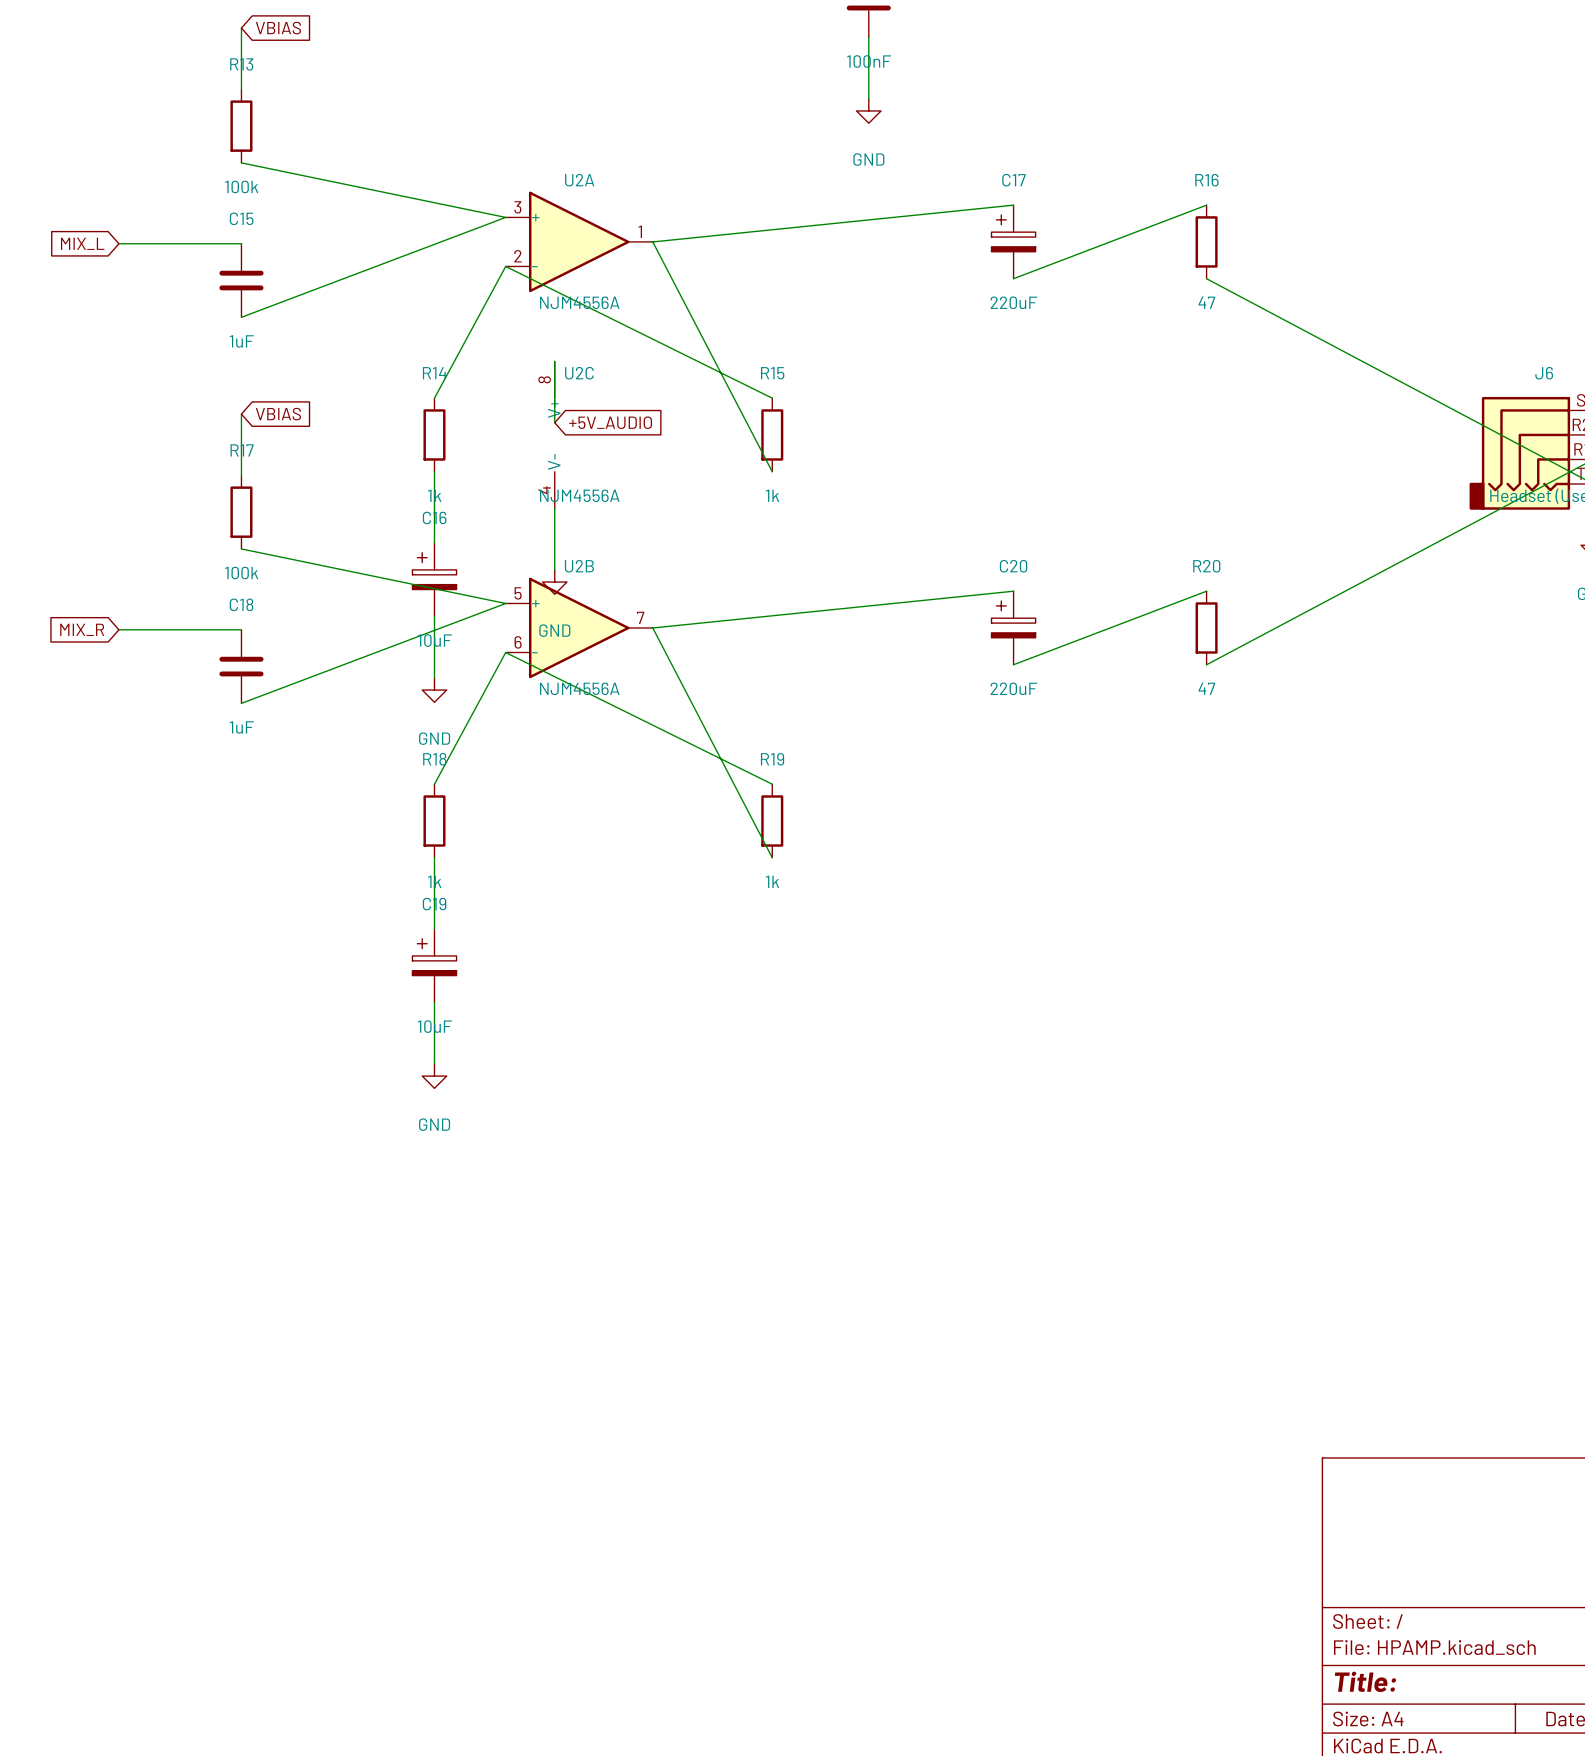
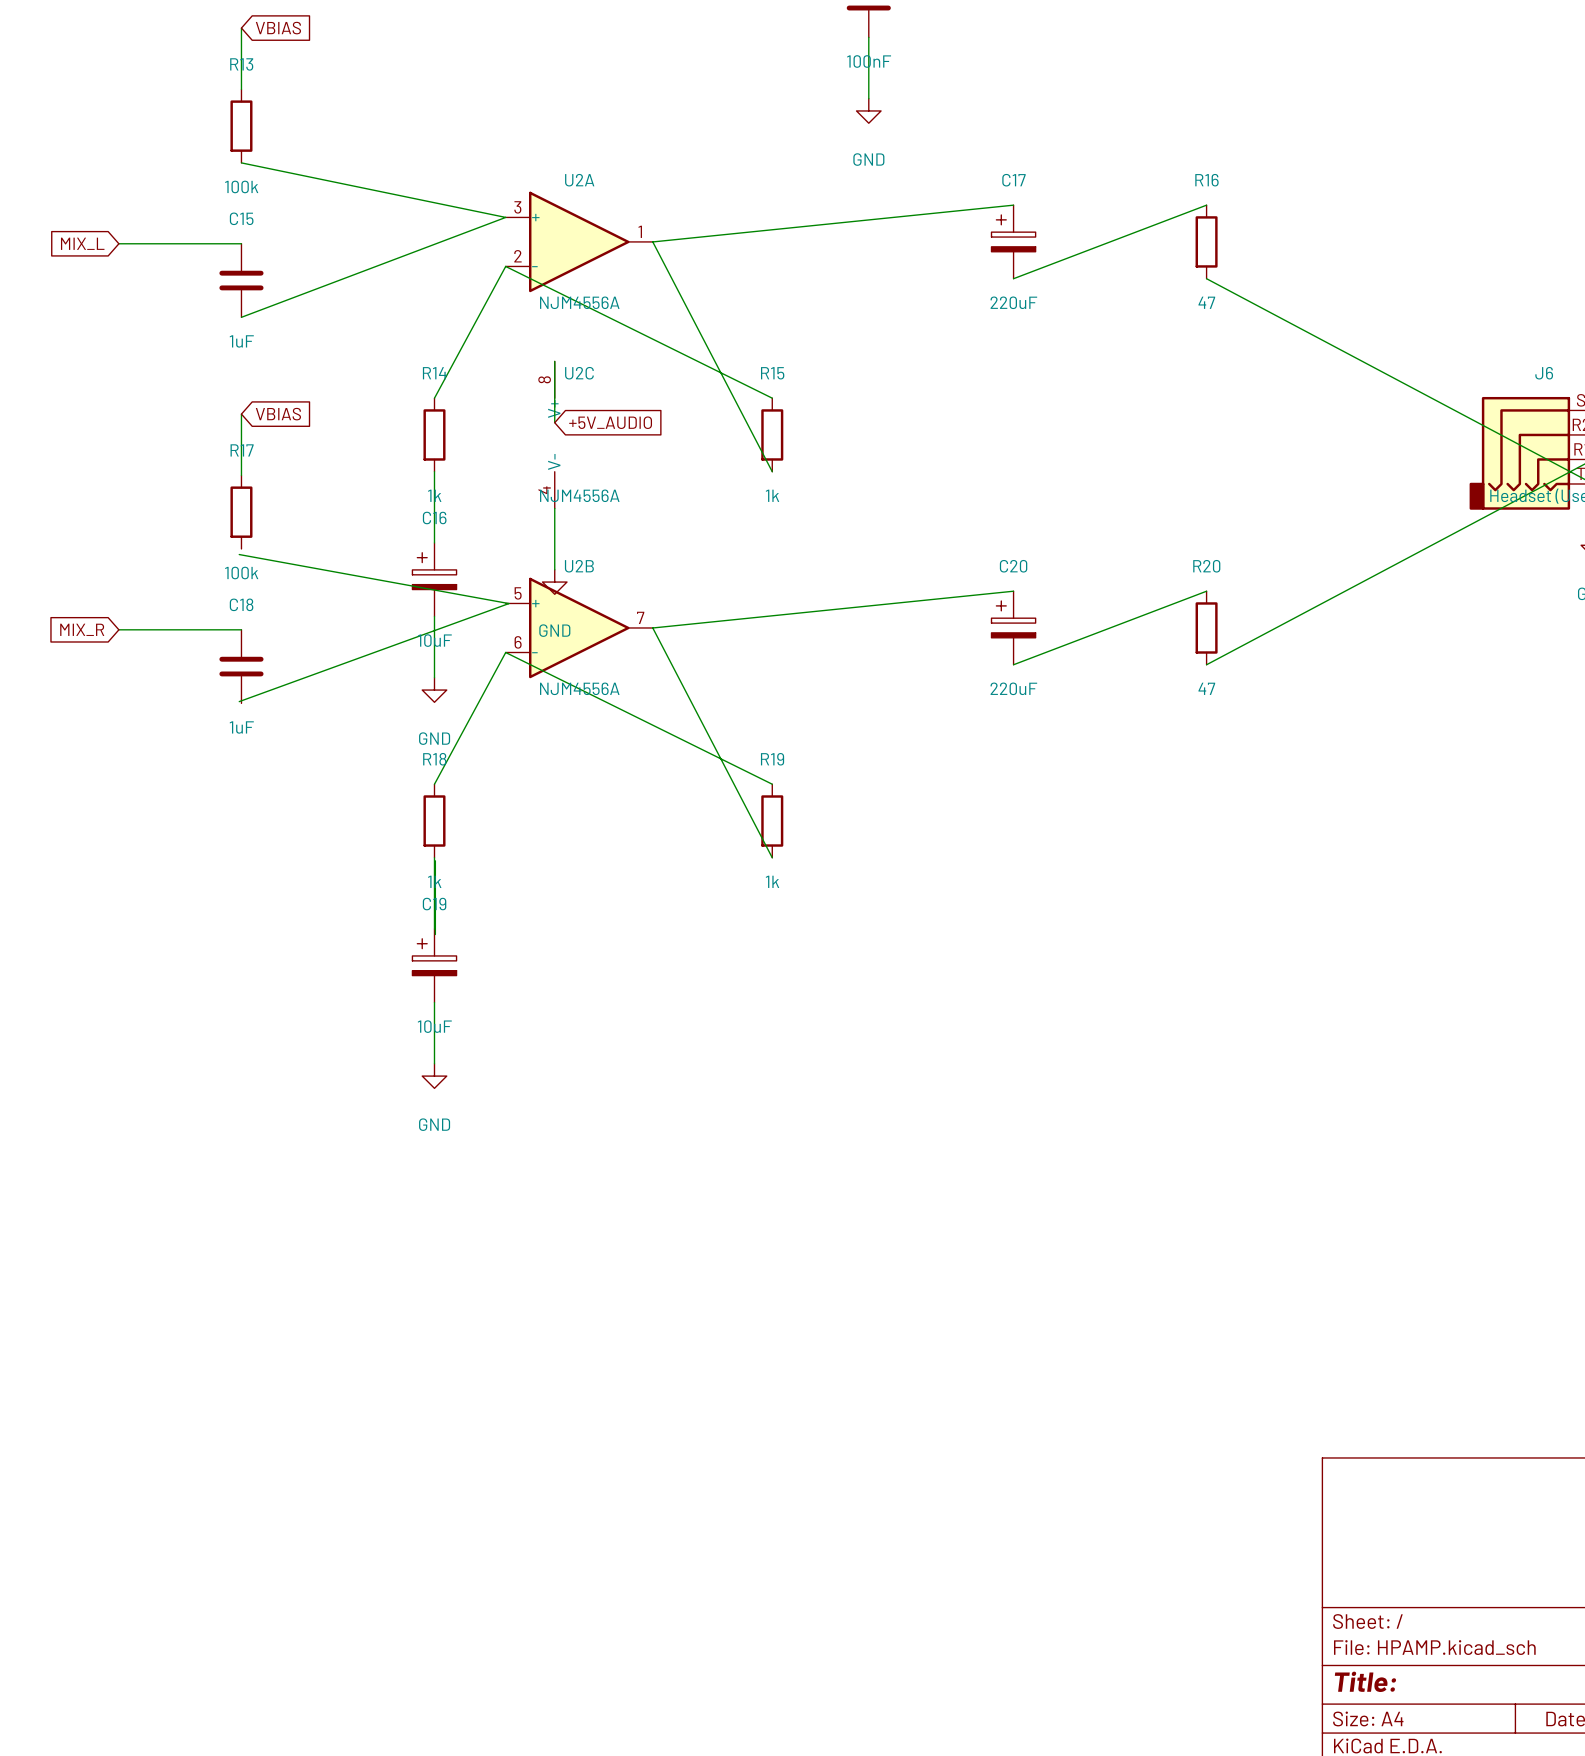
wire: (241, 548) (505, 603) (241, 703) -> none
wire: none -> (239, 554) (508, 603) (239, 701)
wire: none -> (435, 860) (435, 934)

